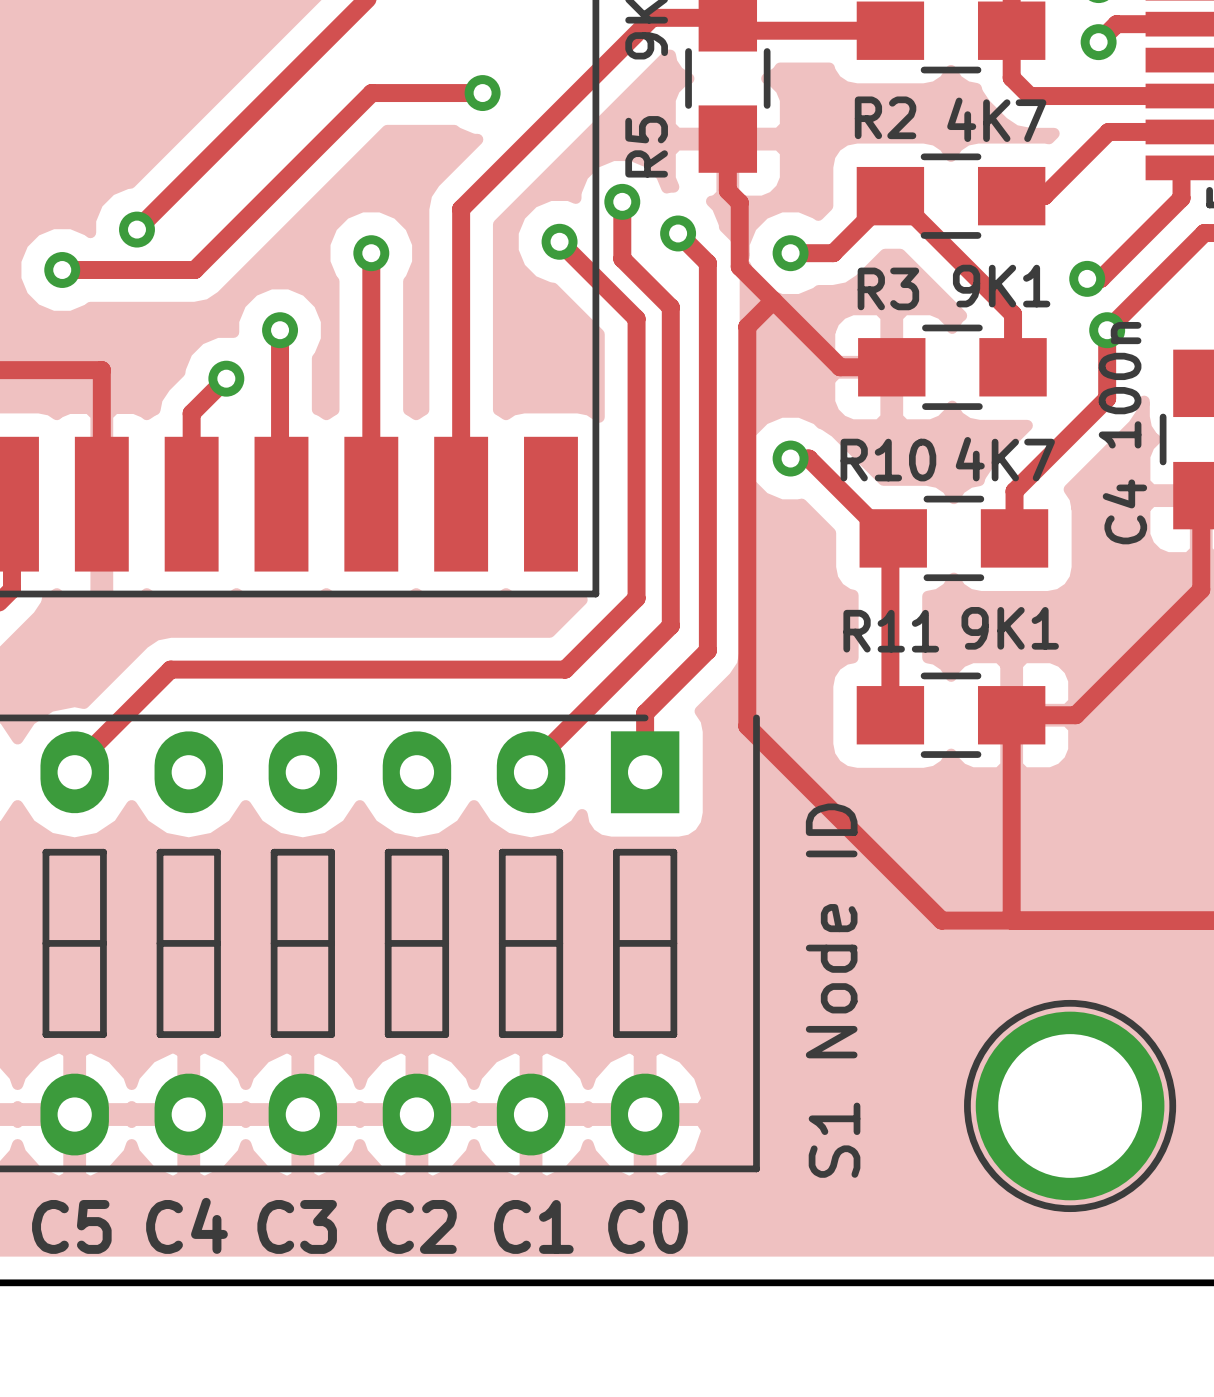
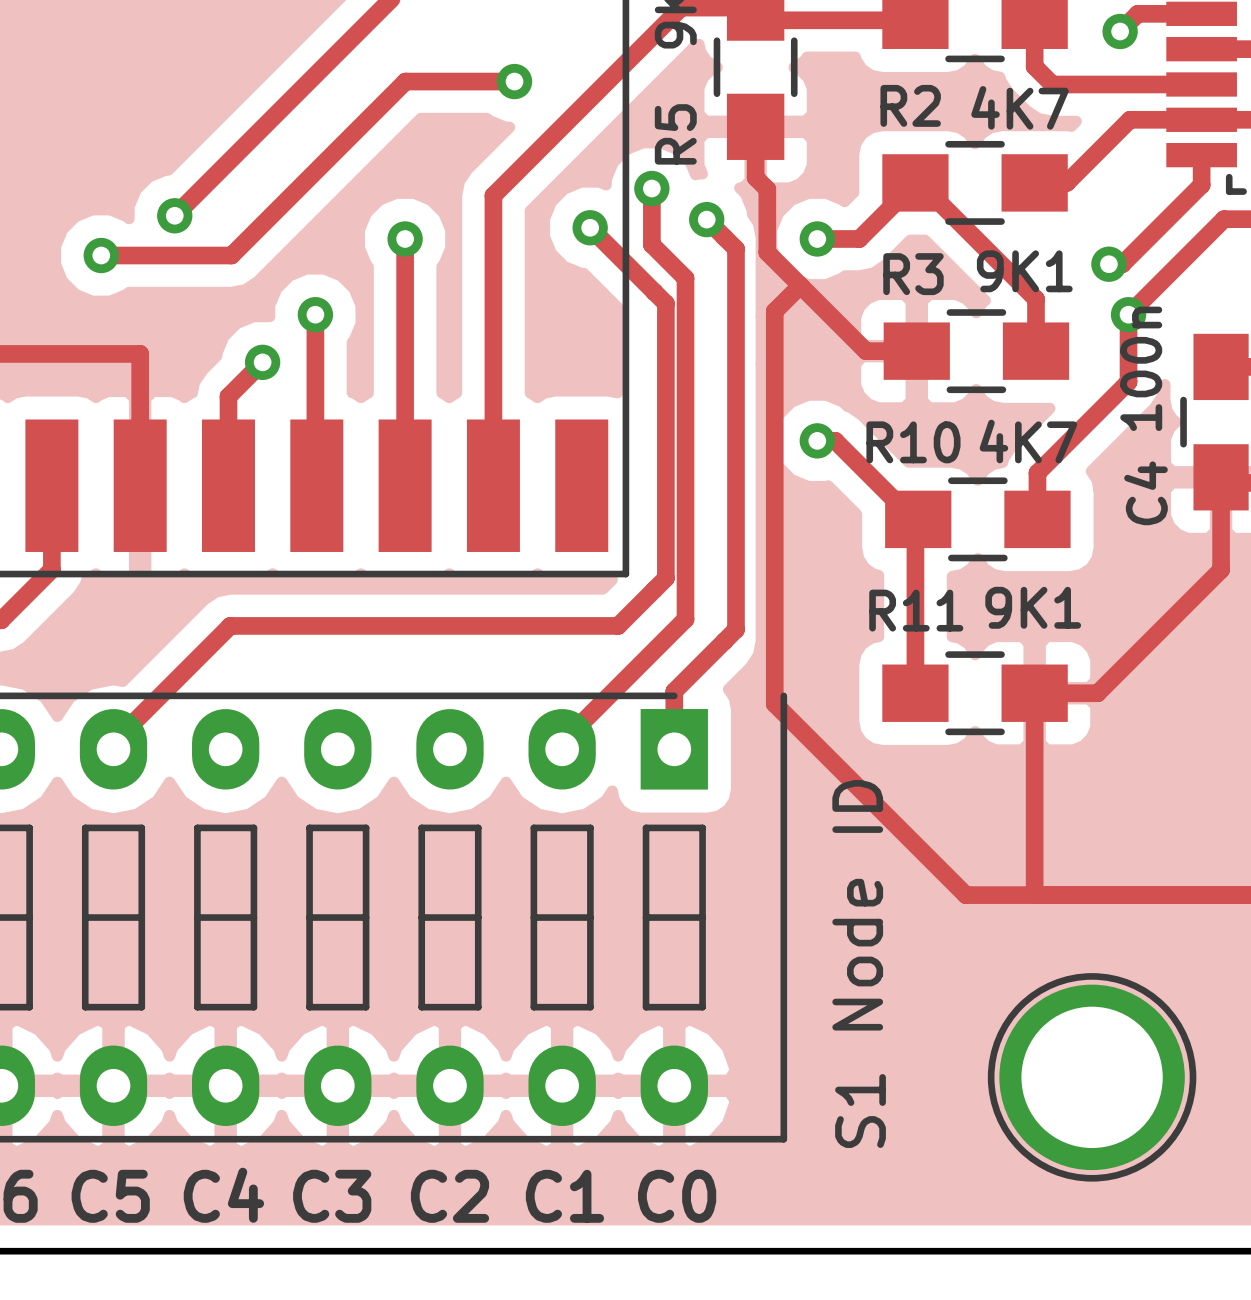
track: (656, 293) (670, 307) (670, 625) (656, 640) -> (685, 278) (685, 619)
track: (588, 646) (565, 669) (170, 669) -> (618, 625) (230, 625) (207, 648)

